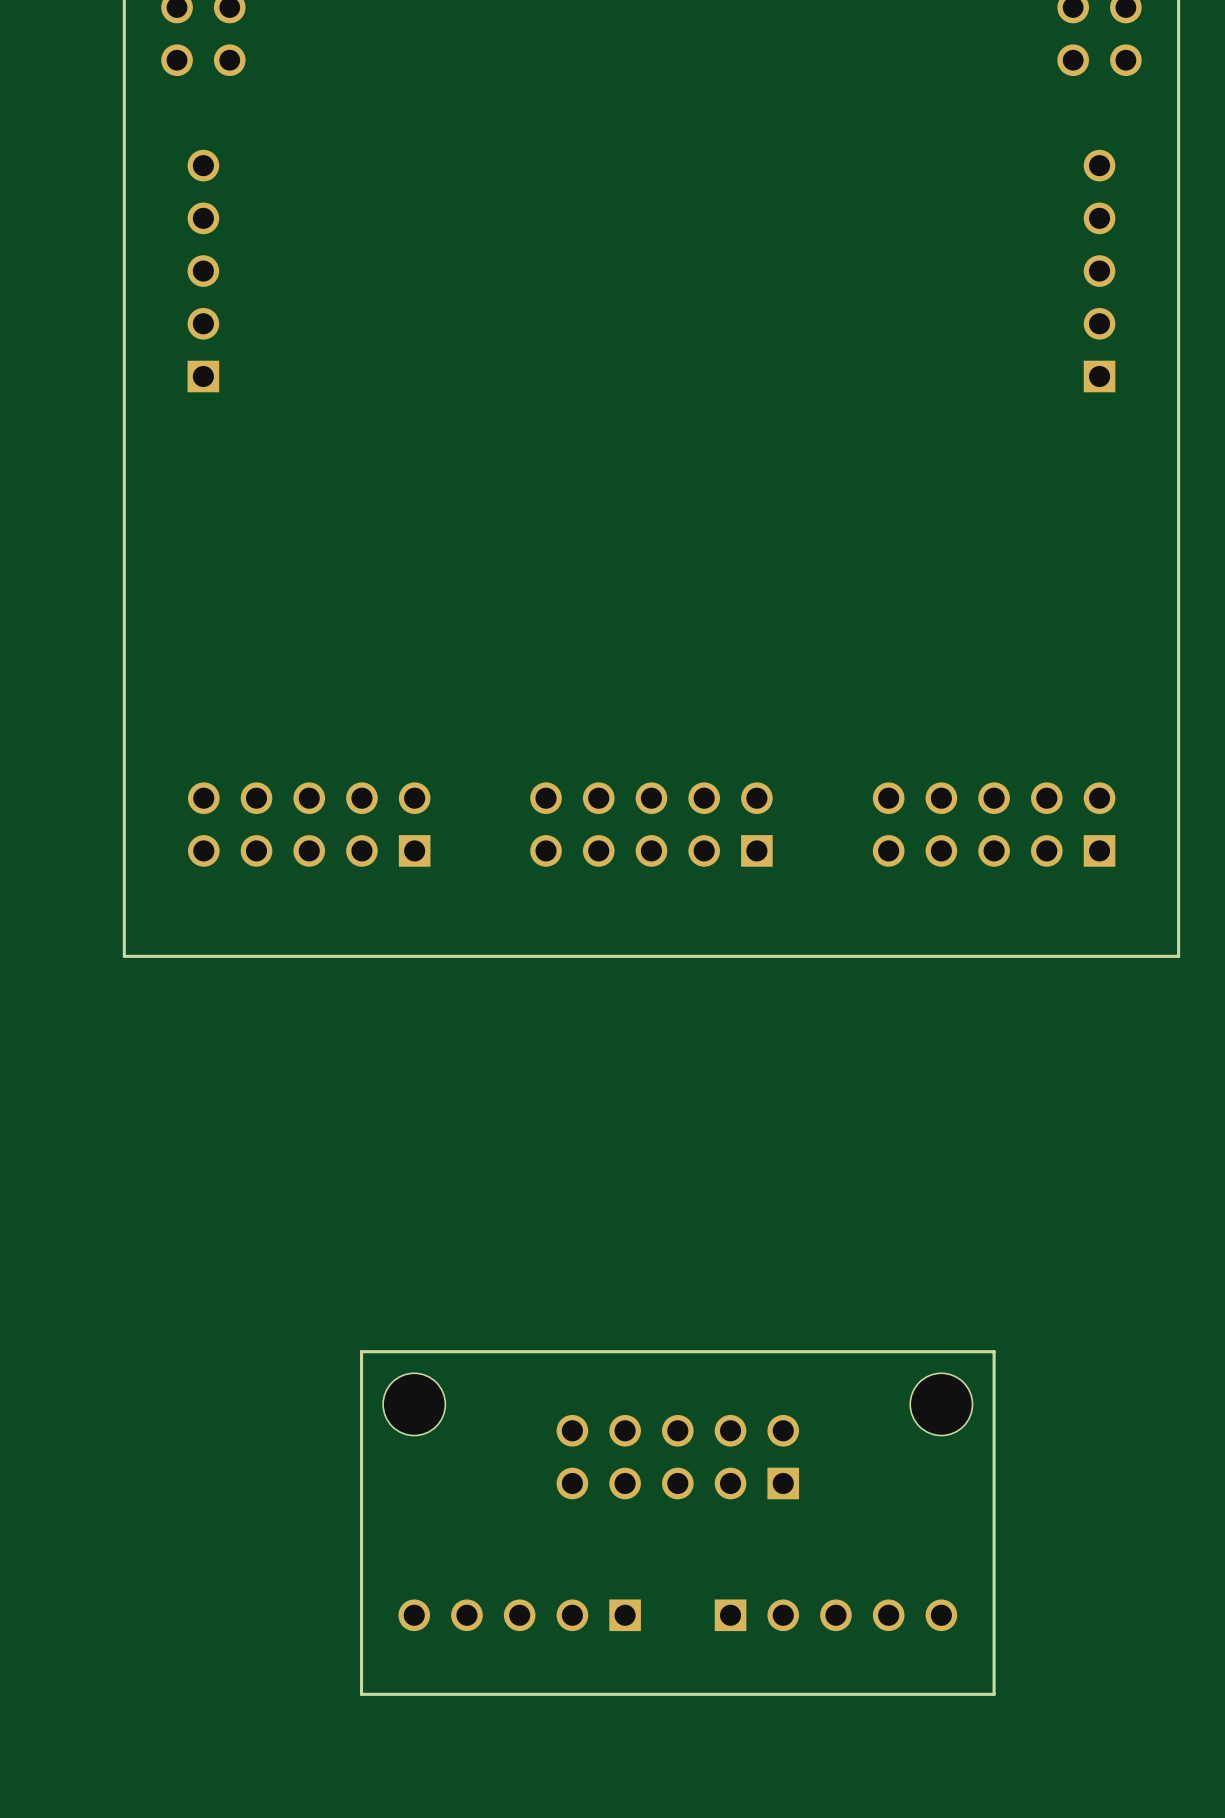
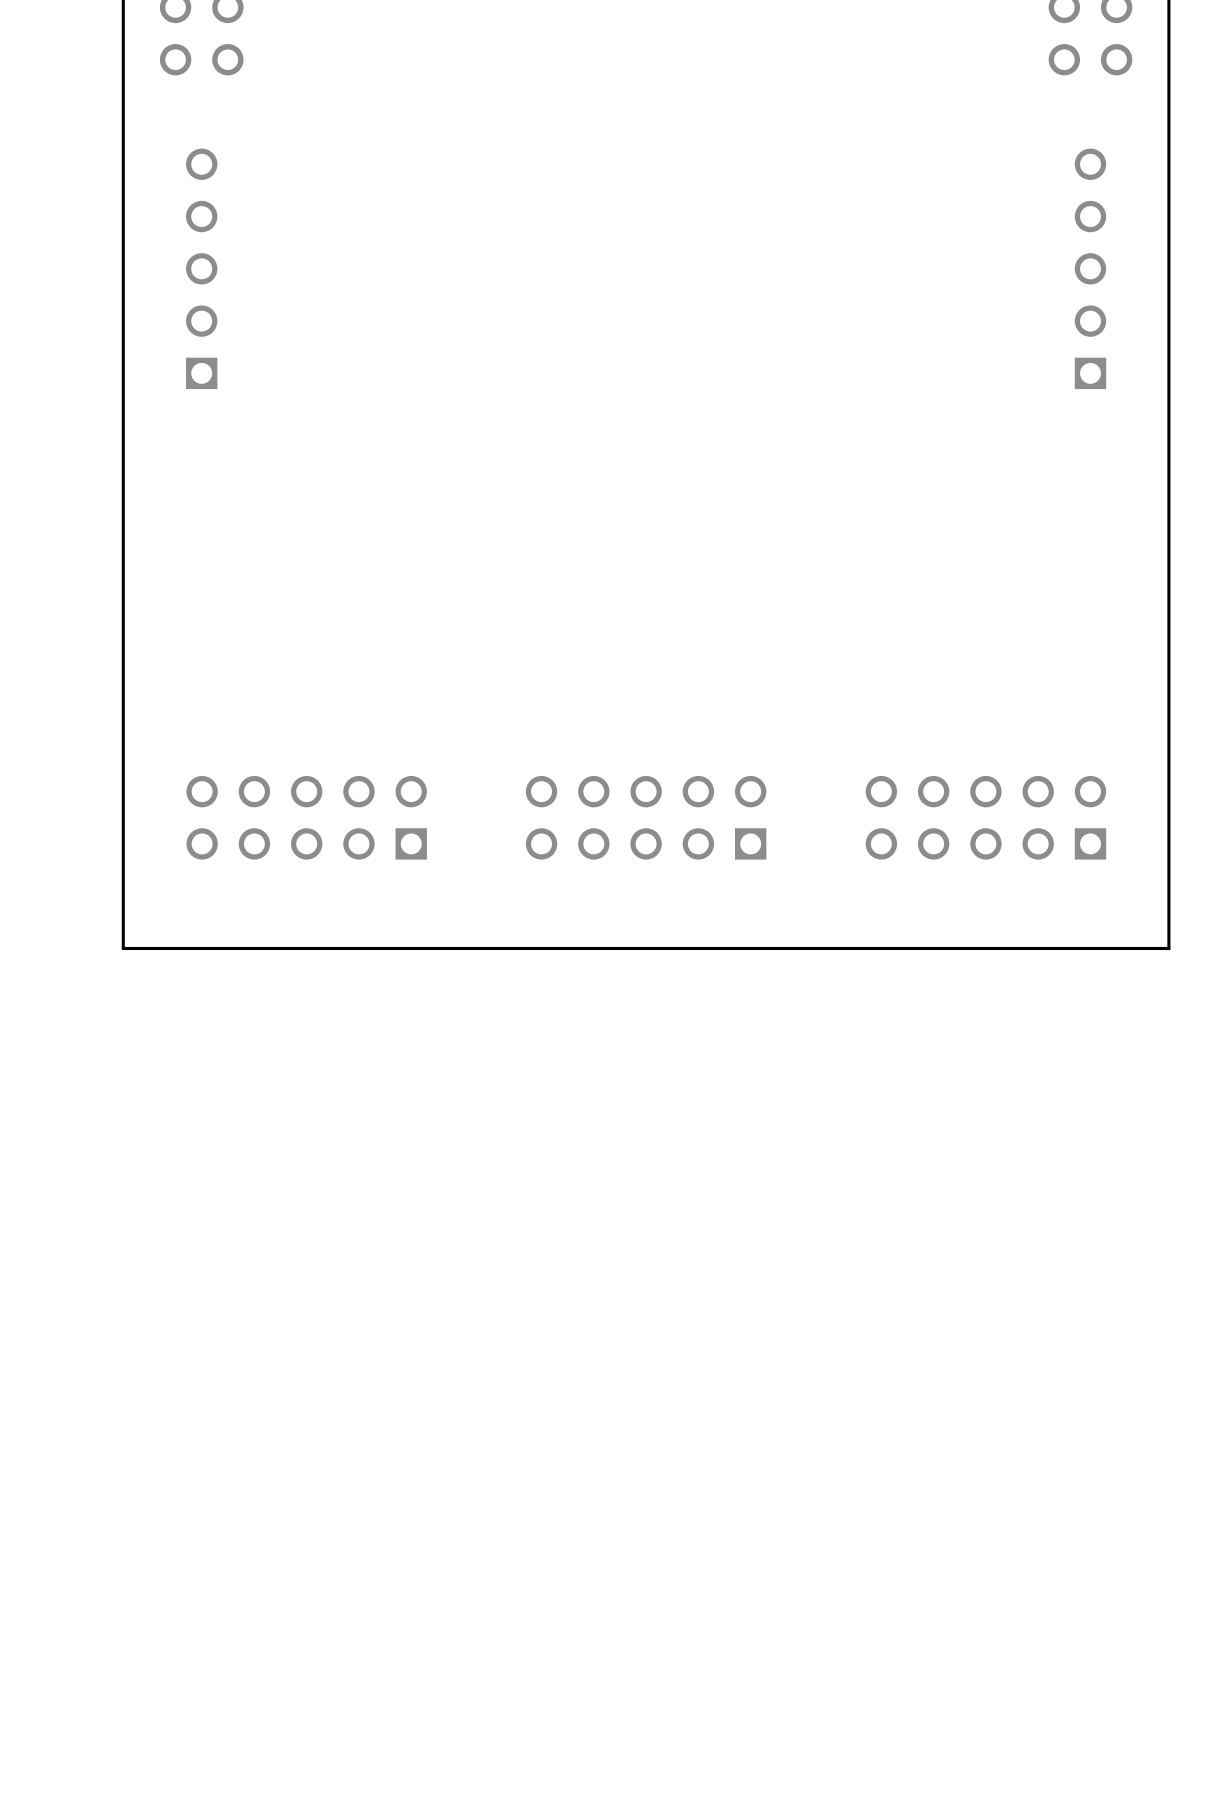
board edge: (994, 1351) (994, 1694) (361, 1694) (361, 1351) (994, 1351) -> none
part: (414, 1404) -> none
part: (941, 1404) -> none
part: (677, 1457) -> none
part: (519, 1615) -> none
part: (835, 1615) -> none

